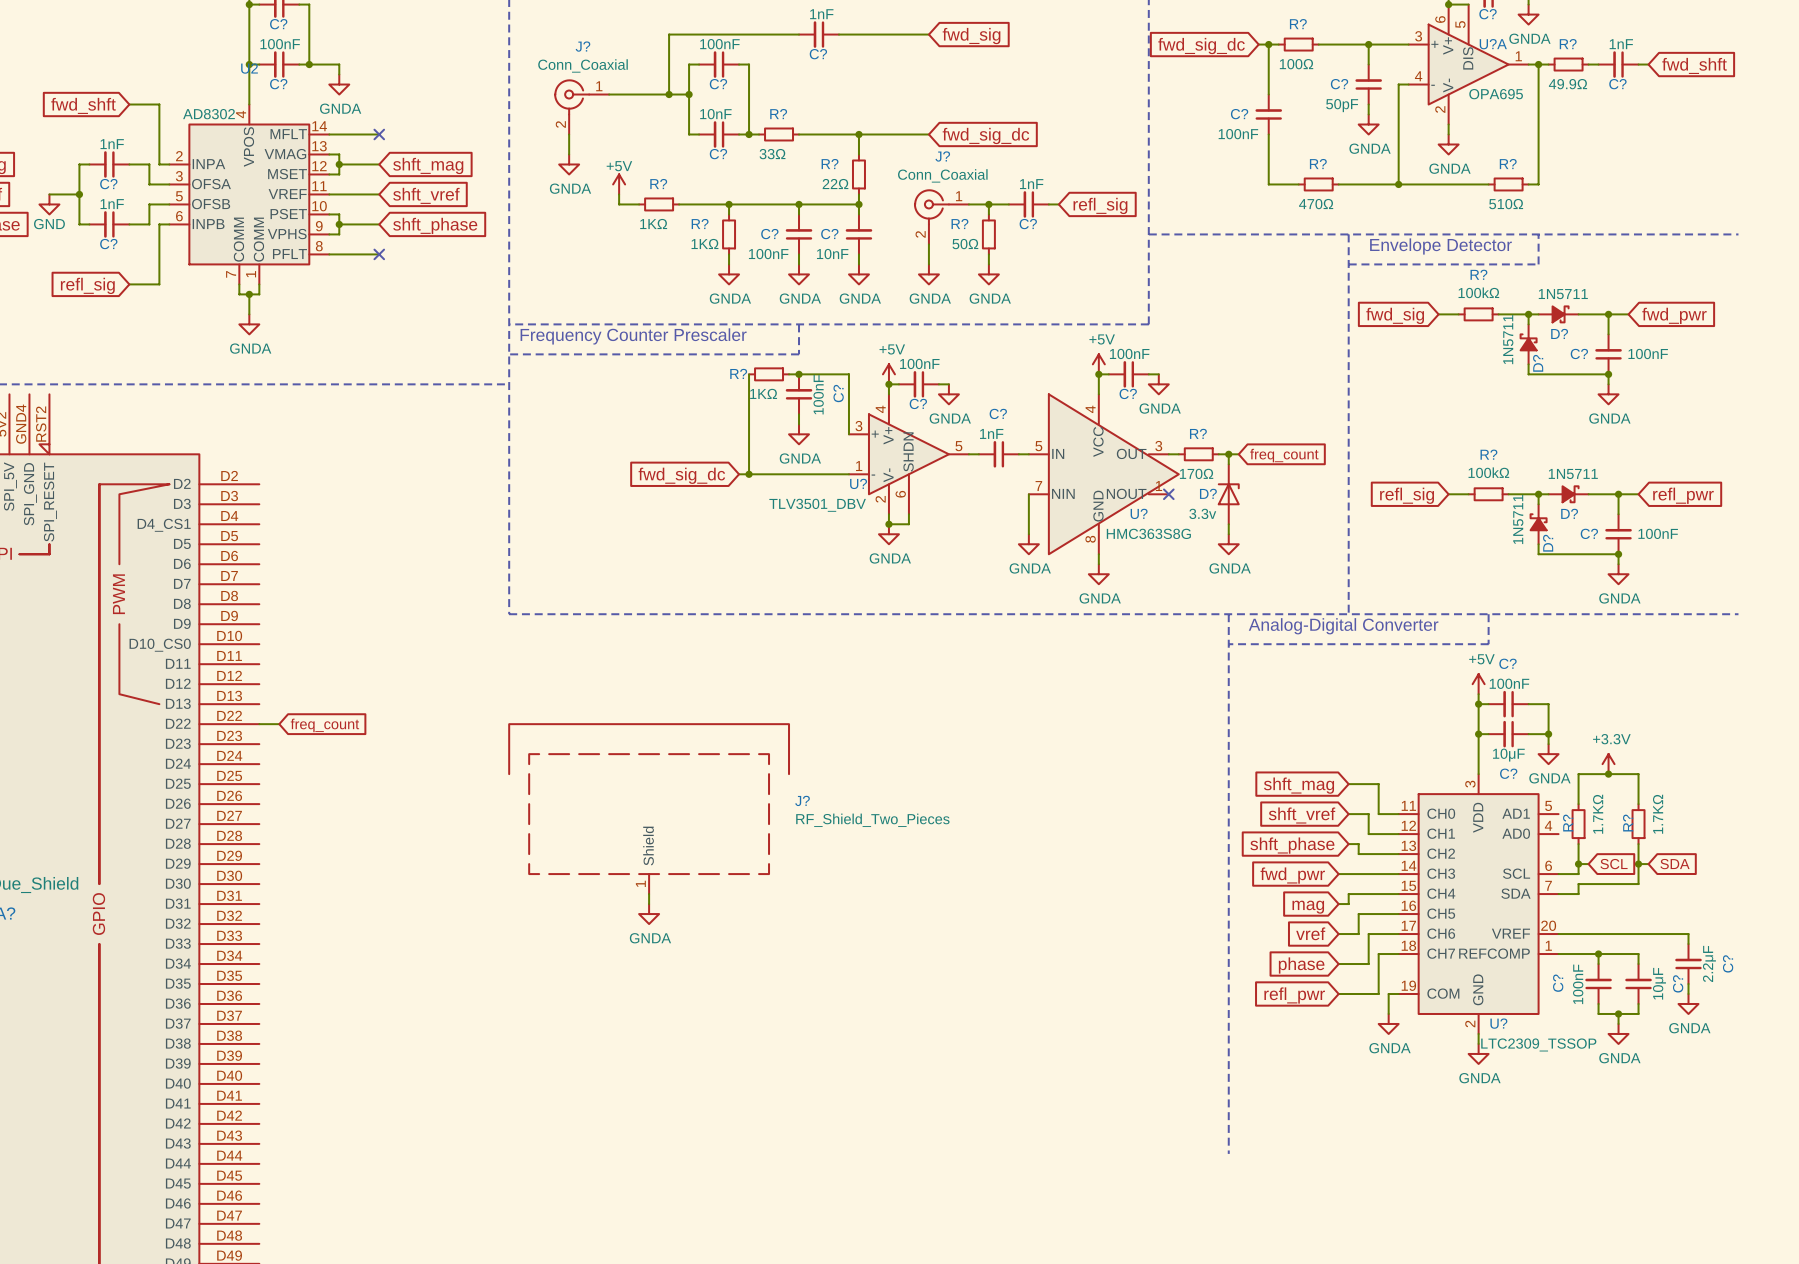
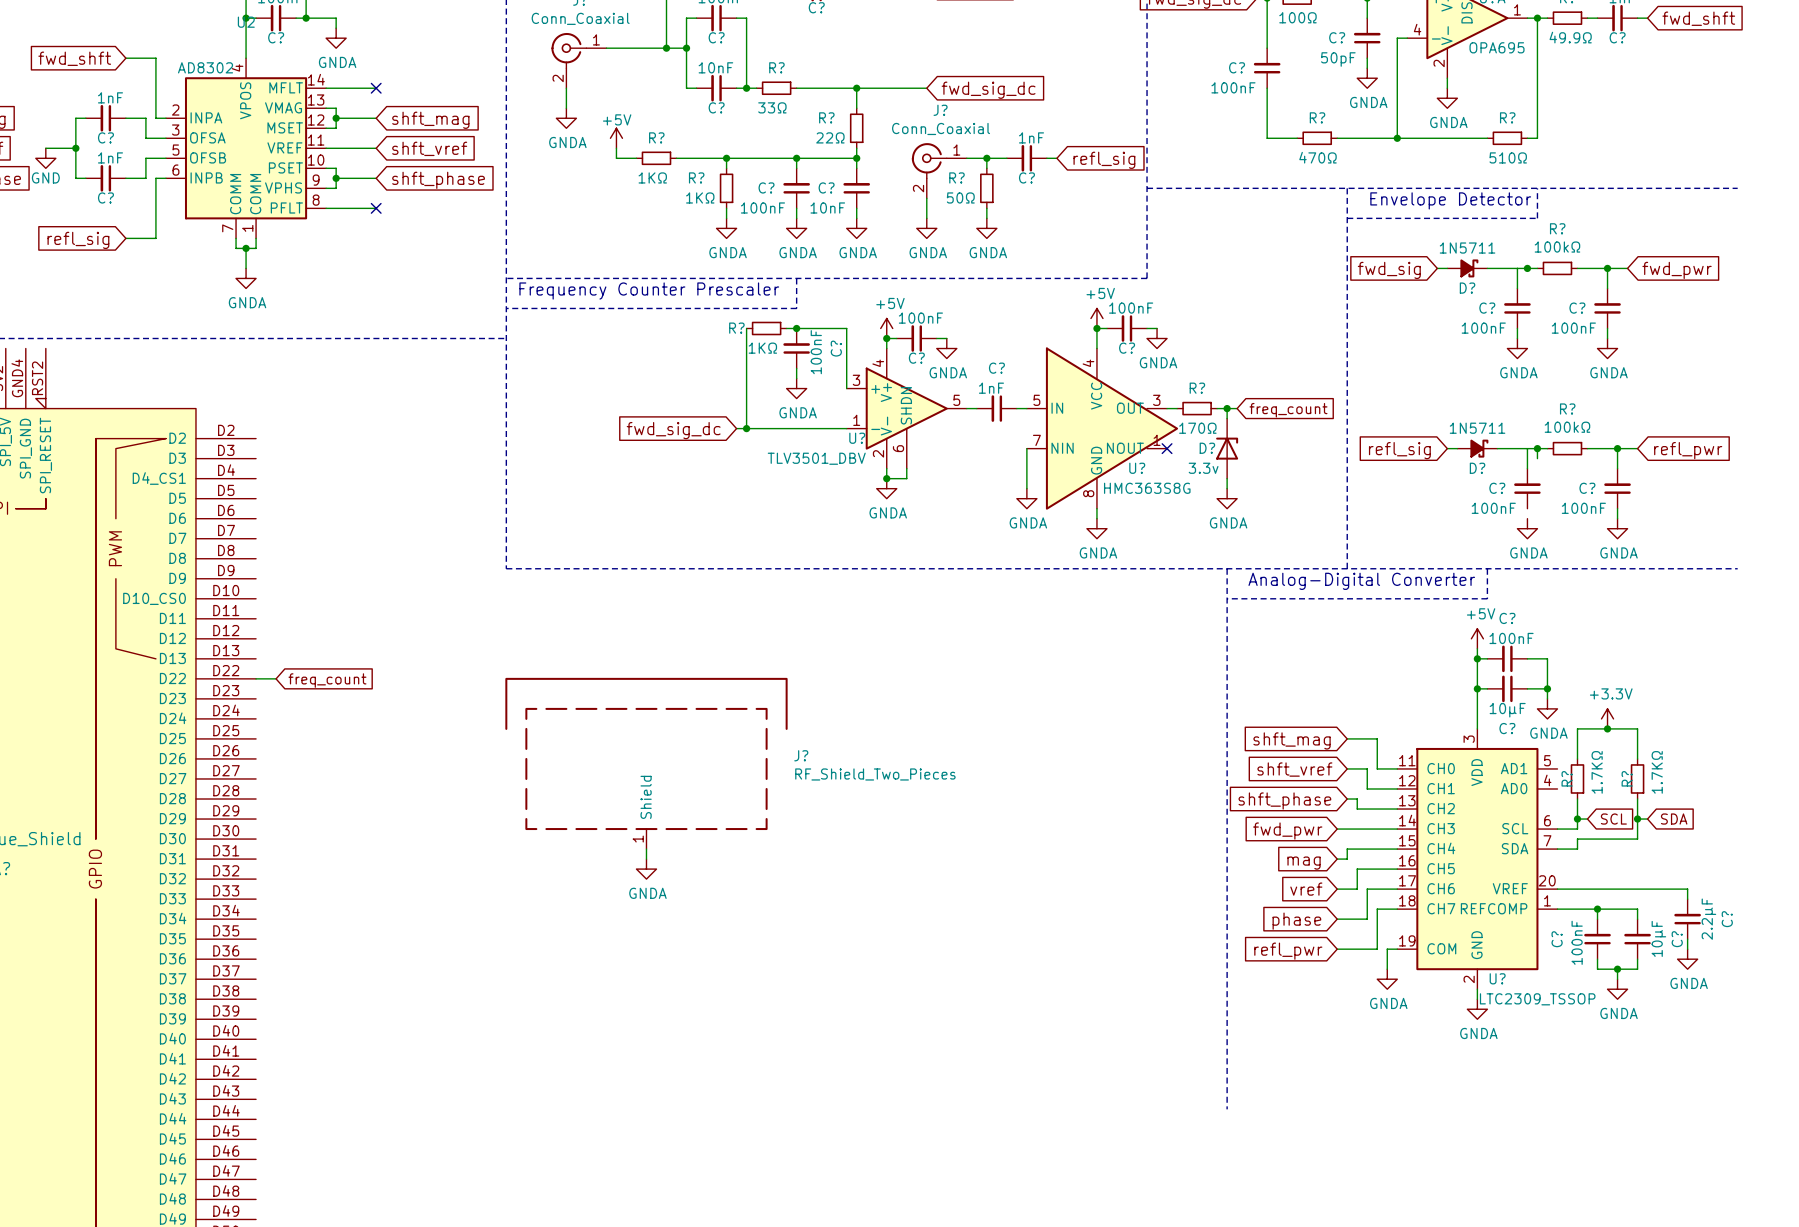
D?: none -> 1N5711 (1467, 268)
R? position: (1478, 314) -> (1557, 268)
wire: none -> (1517, 268) (1517, 288)
wire: (1528, 314) (1528, 324) -> (1517, 328) (1517, 338)
D?: 1N5711 (1558, 314) -> none
D?: 1N5711 (1528, 344) -> none
C? value position: 100nF (1648, 353) -> 100nF (1573, 328)
C?: none -> 100nF (1517, 308)
wire: (1528, 364) (1528, 374) (1608, 374) -> none
junction: (1608, 374) -> none
power symbol: none -> GNDA (1517, 348)
D?: none -> 1N5711 (1477, 448)
R? position: (1488, 494) -> (1567, 448)
wire: none -> (1527, 448) (1527, 468)
D?: 1N5711 (1568, 494) -> none
D?: 1N5711 (1538, 524) -> none
C? value position: 100nF (1658, 533) -> 100nF (1583, 508)
C?: none -> 100nF (1527, 488)
wire: (1538, 544) (1538, 554) (1618, 554) -> none
junction: (1618, 554) -> none
power symbol: none -> GNDA (1527, 528)

